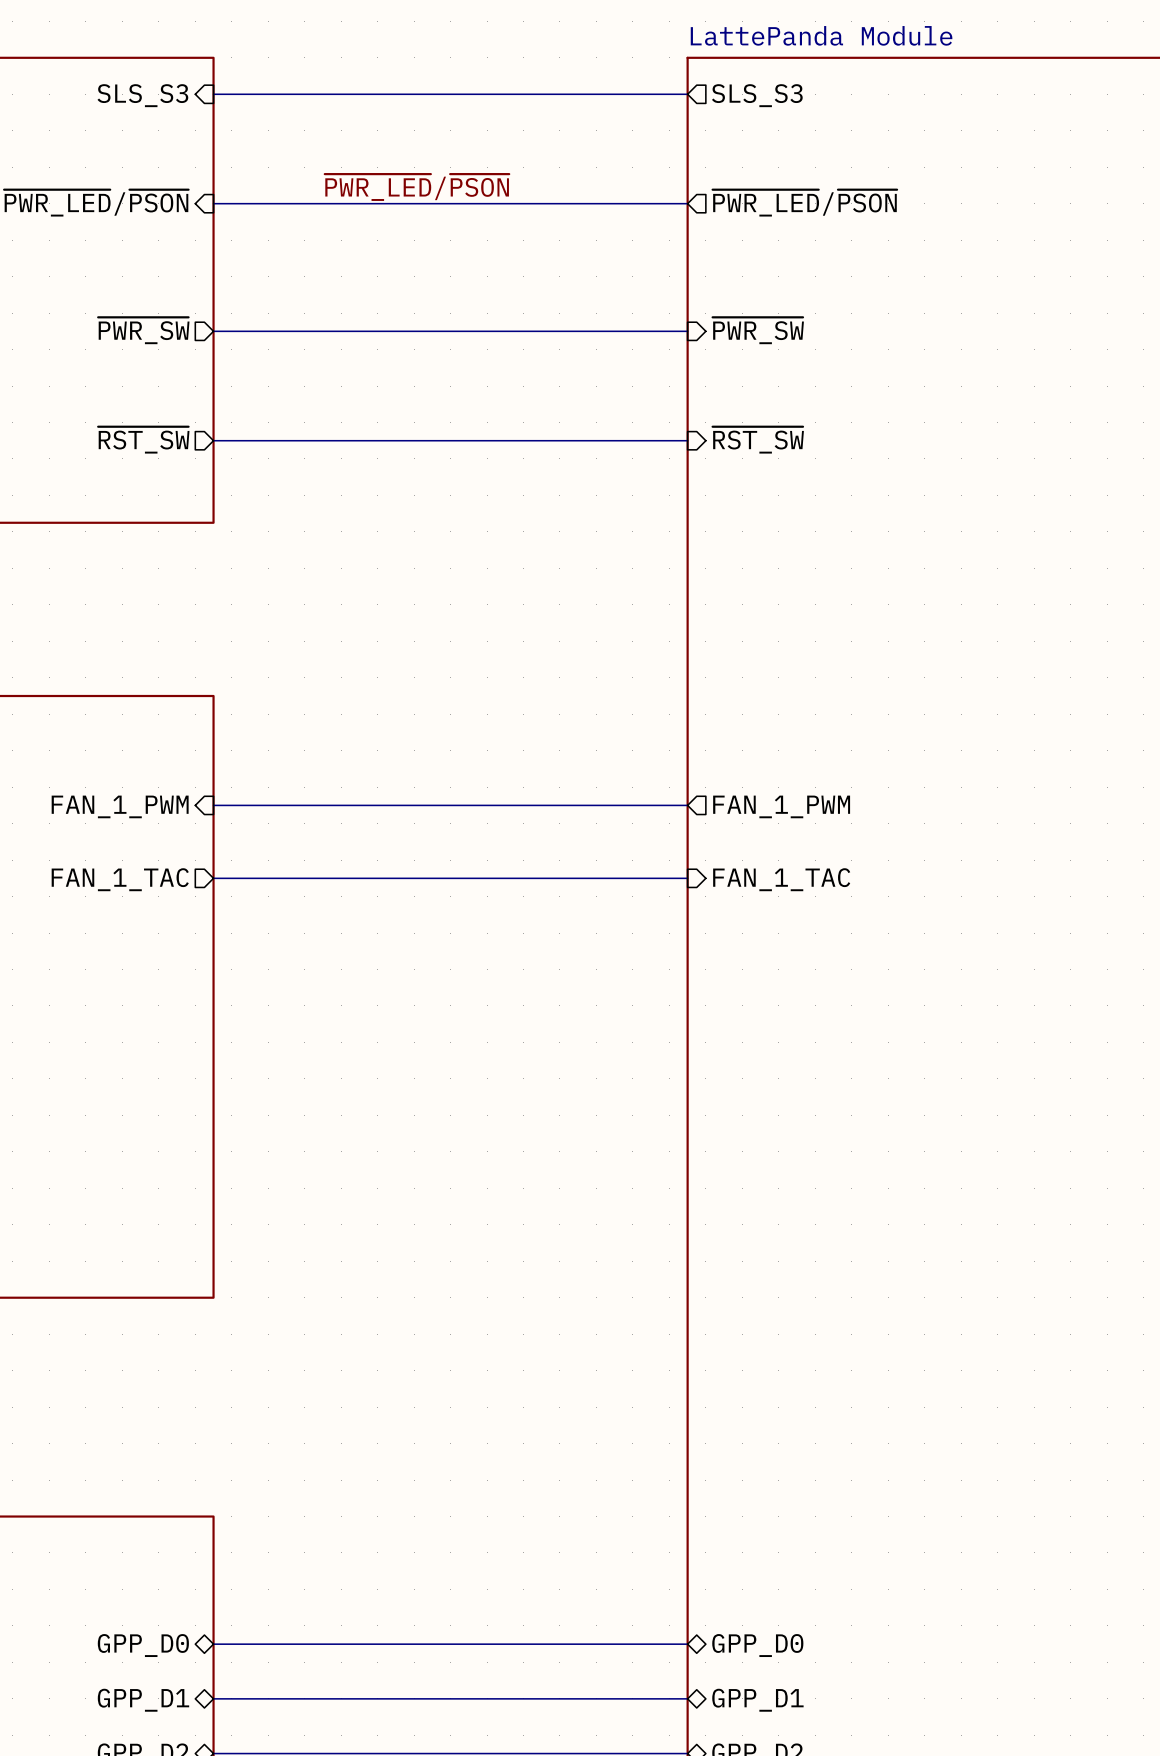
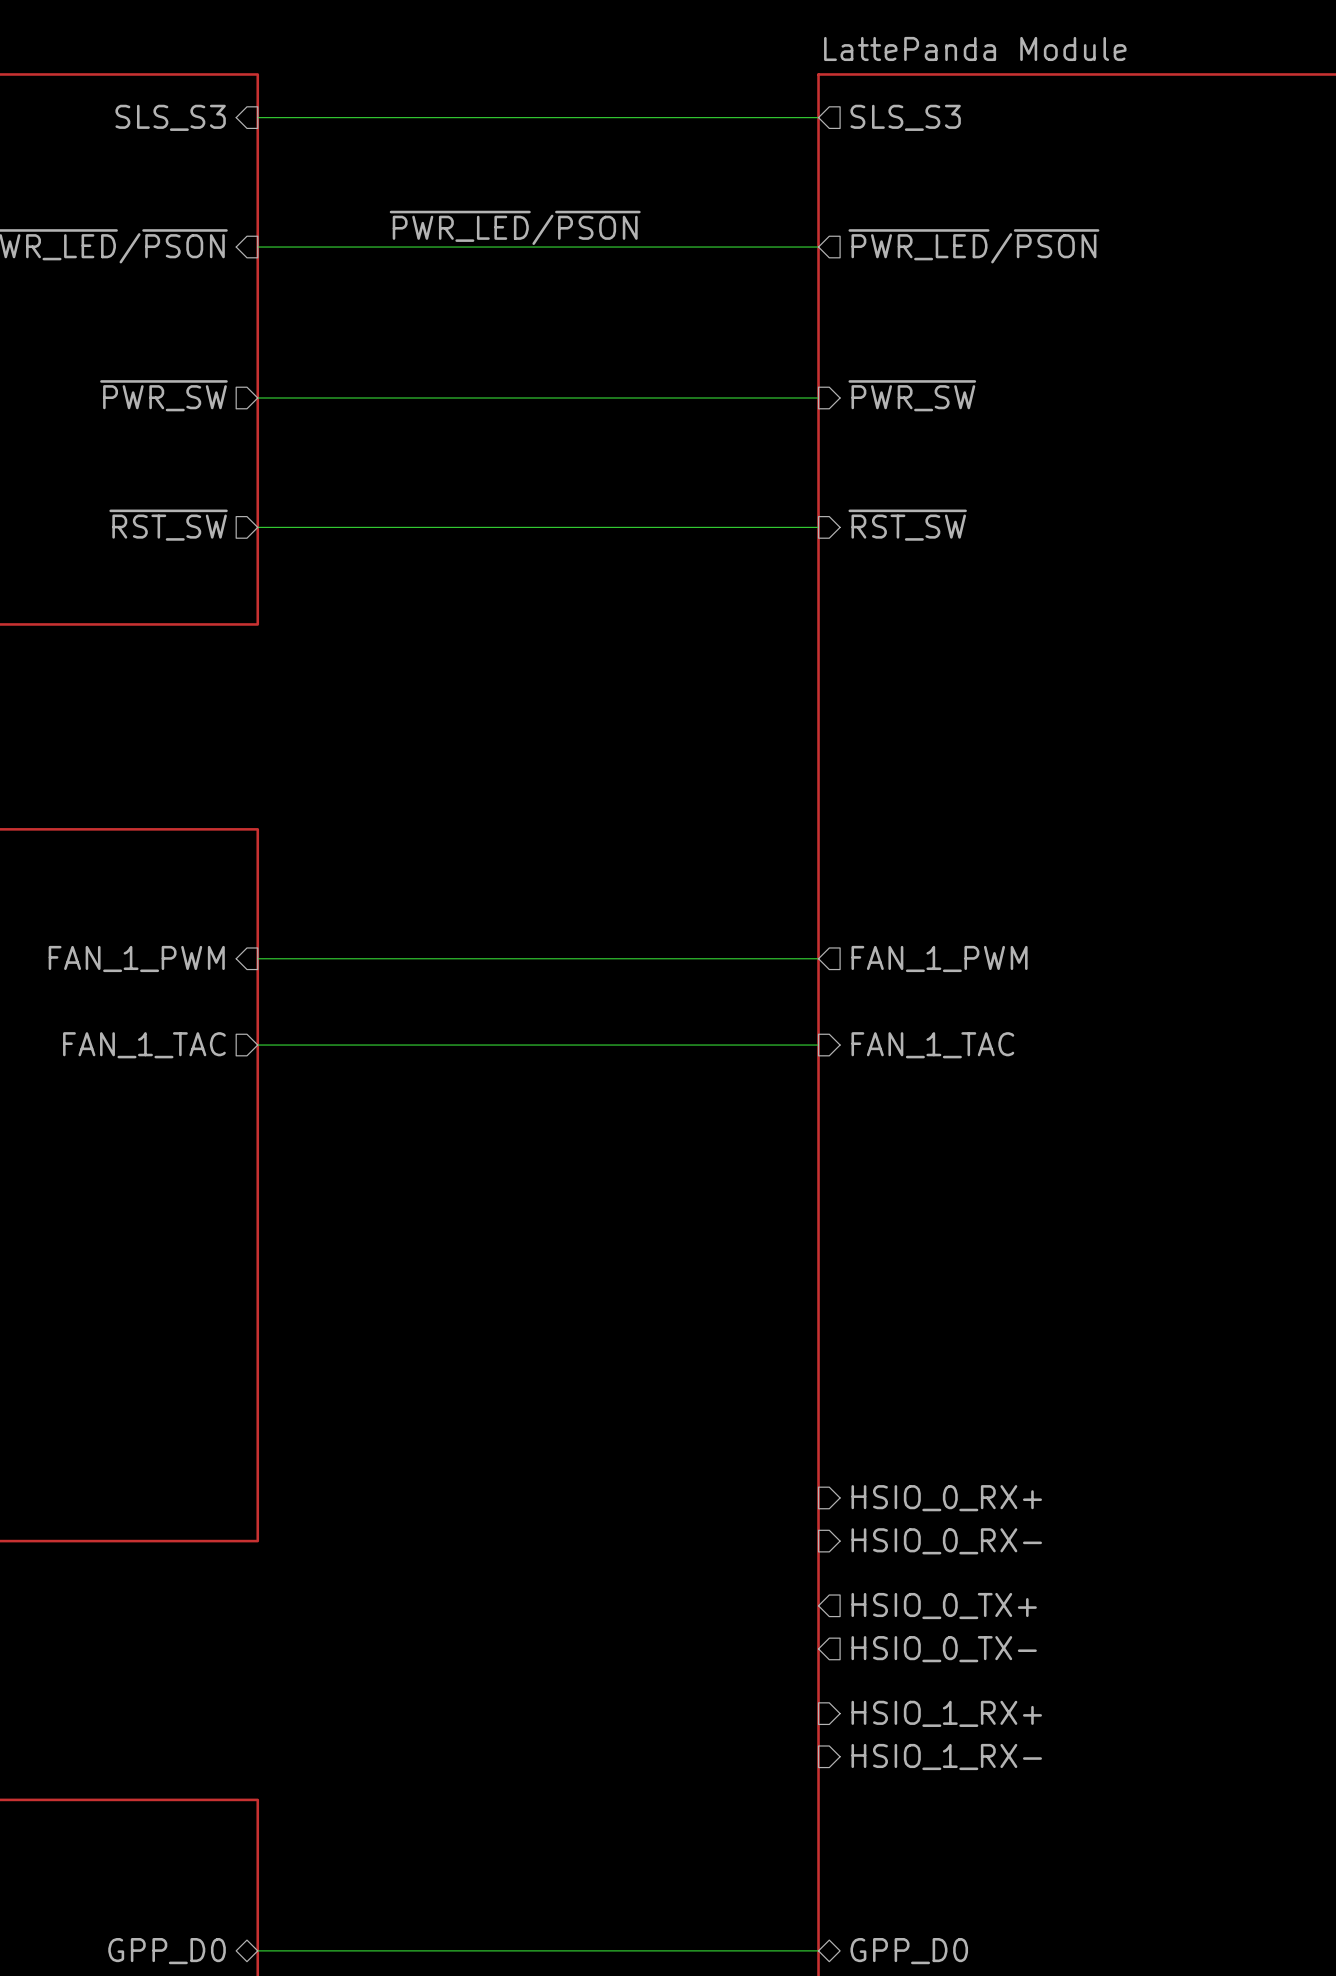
sheet pin: none -> HSIO_0_RX+ (946, 1498)
sheet pin: none -> HSIO_0_RX- (946, 1541)
sheet pin: none -> HSIO_0_TX+ (944, 1606)
sheet pin: none -> HSIO_0_TX- (944, 1649)
sheet pin: none -> HSIO_1_RX+ (946, 1713)
sheet pin: none -> HSIO_1_RX- (946, 1756)

